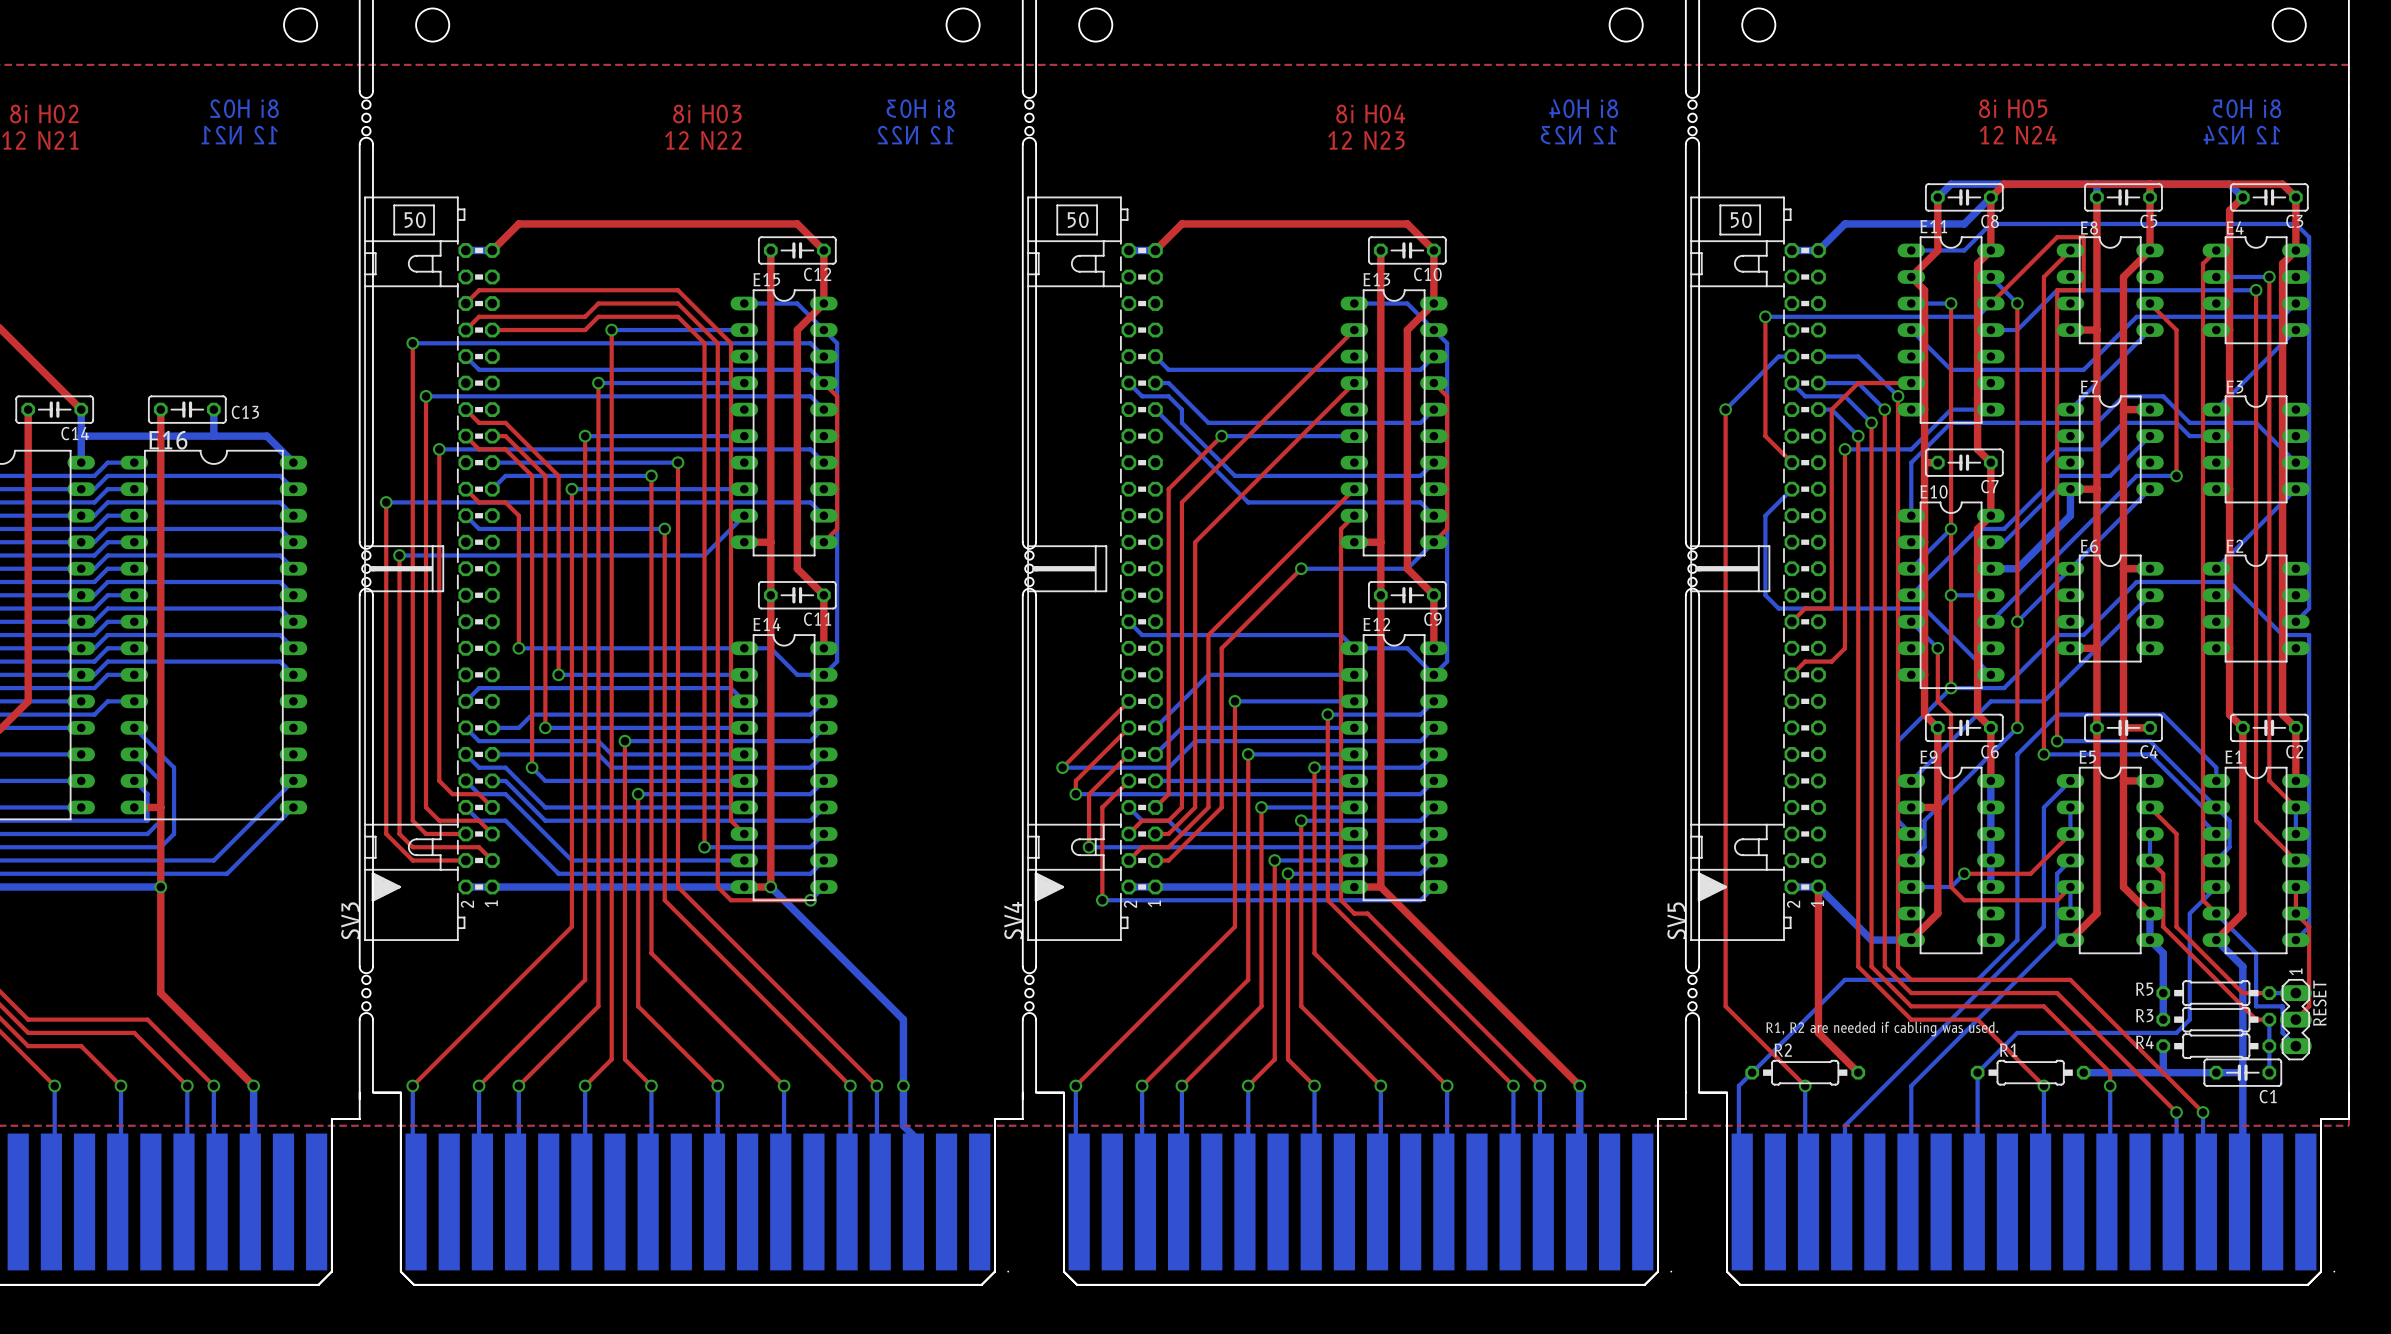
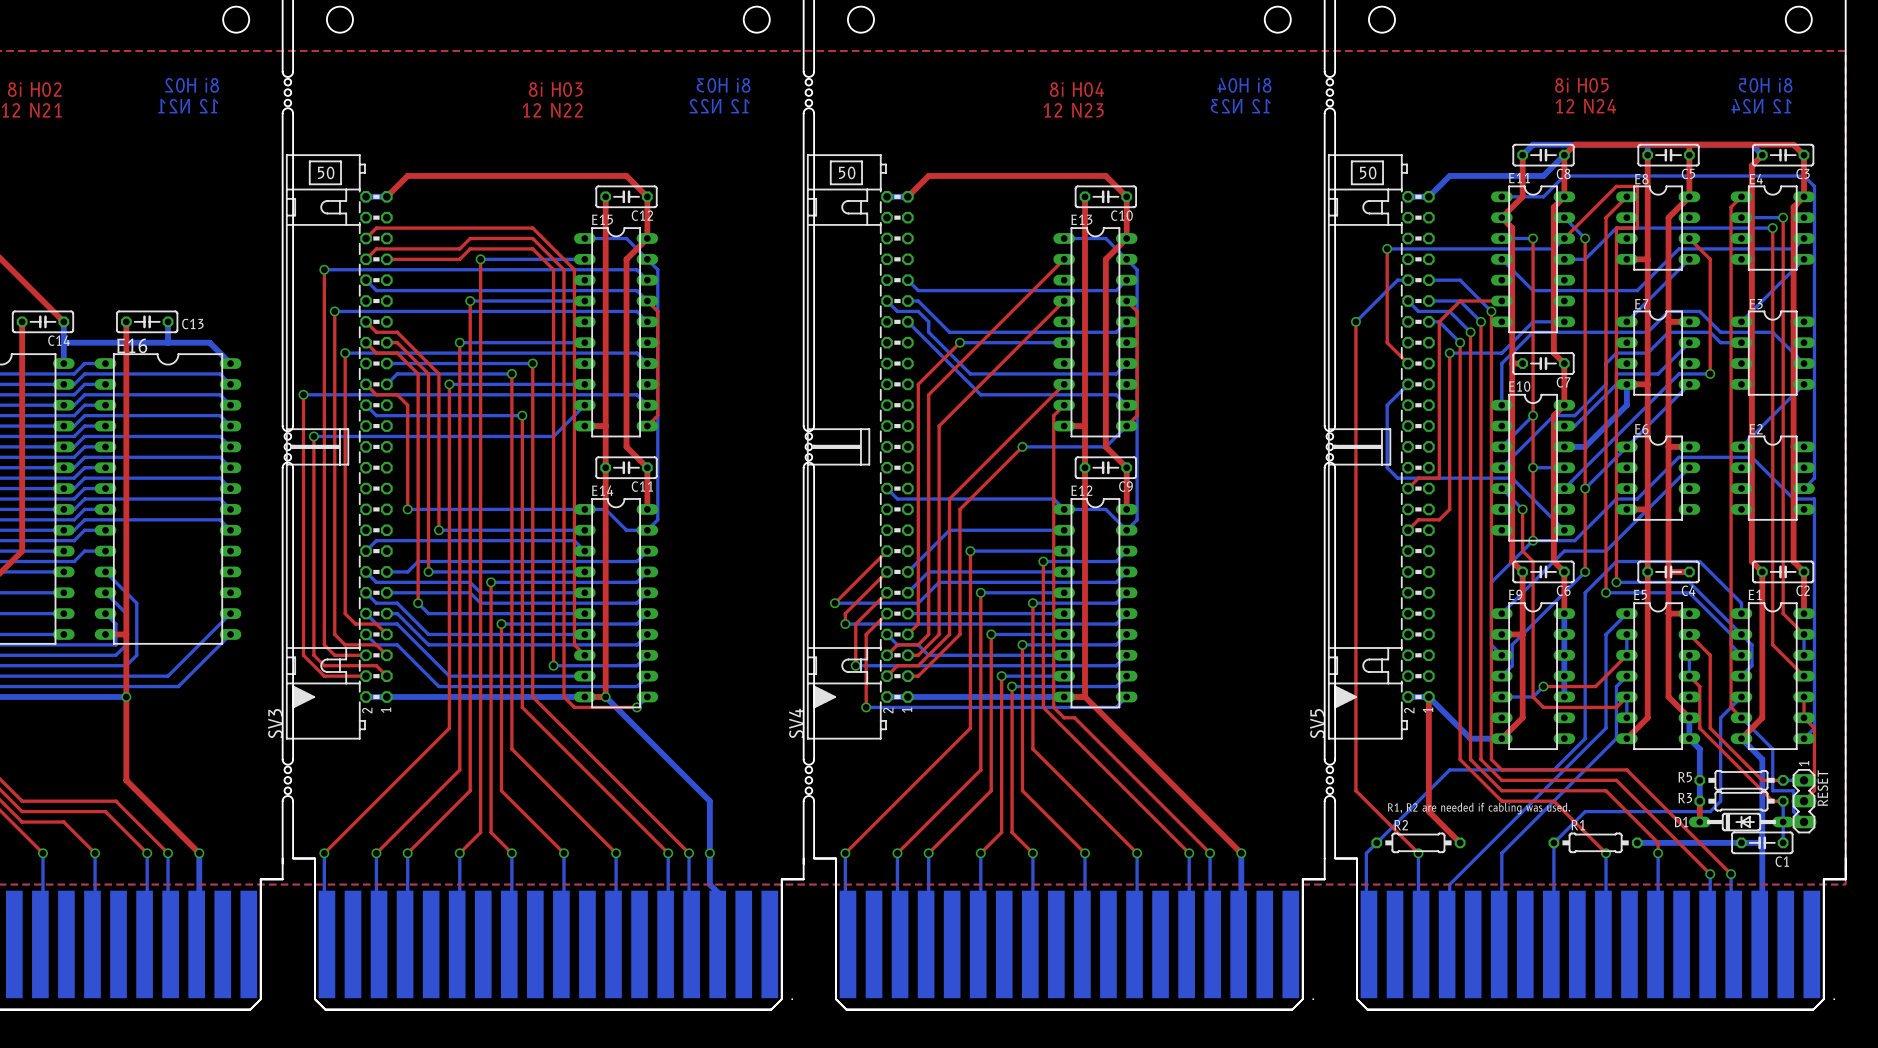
top track: none -> (1699, 801) (1699, 822)
bottom track: (2163, 1046) (2163, 1072) -> none
R4: (2216, 1046) -> none
D1: none -> (1741, 822)

